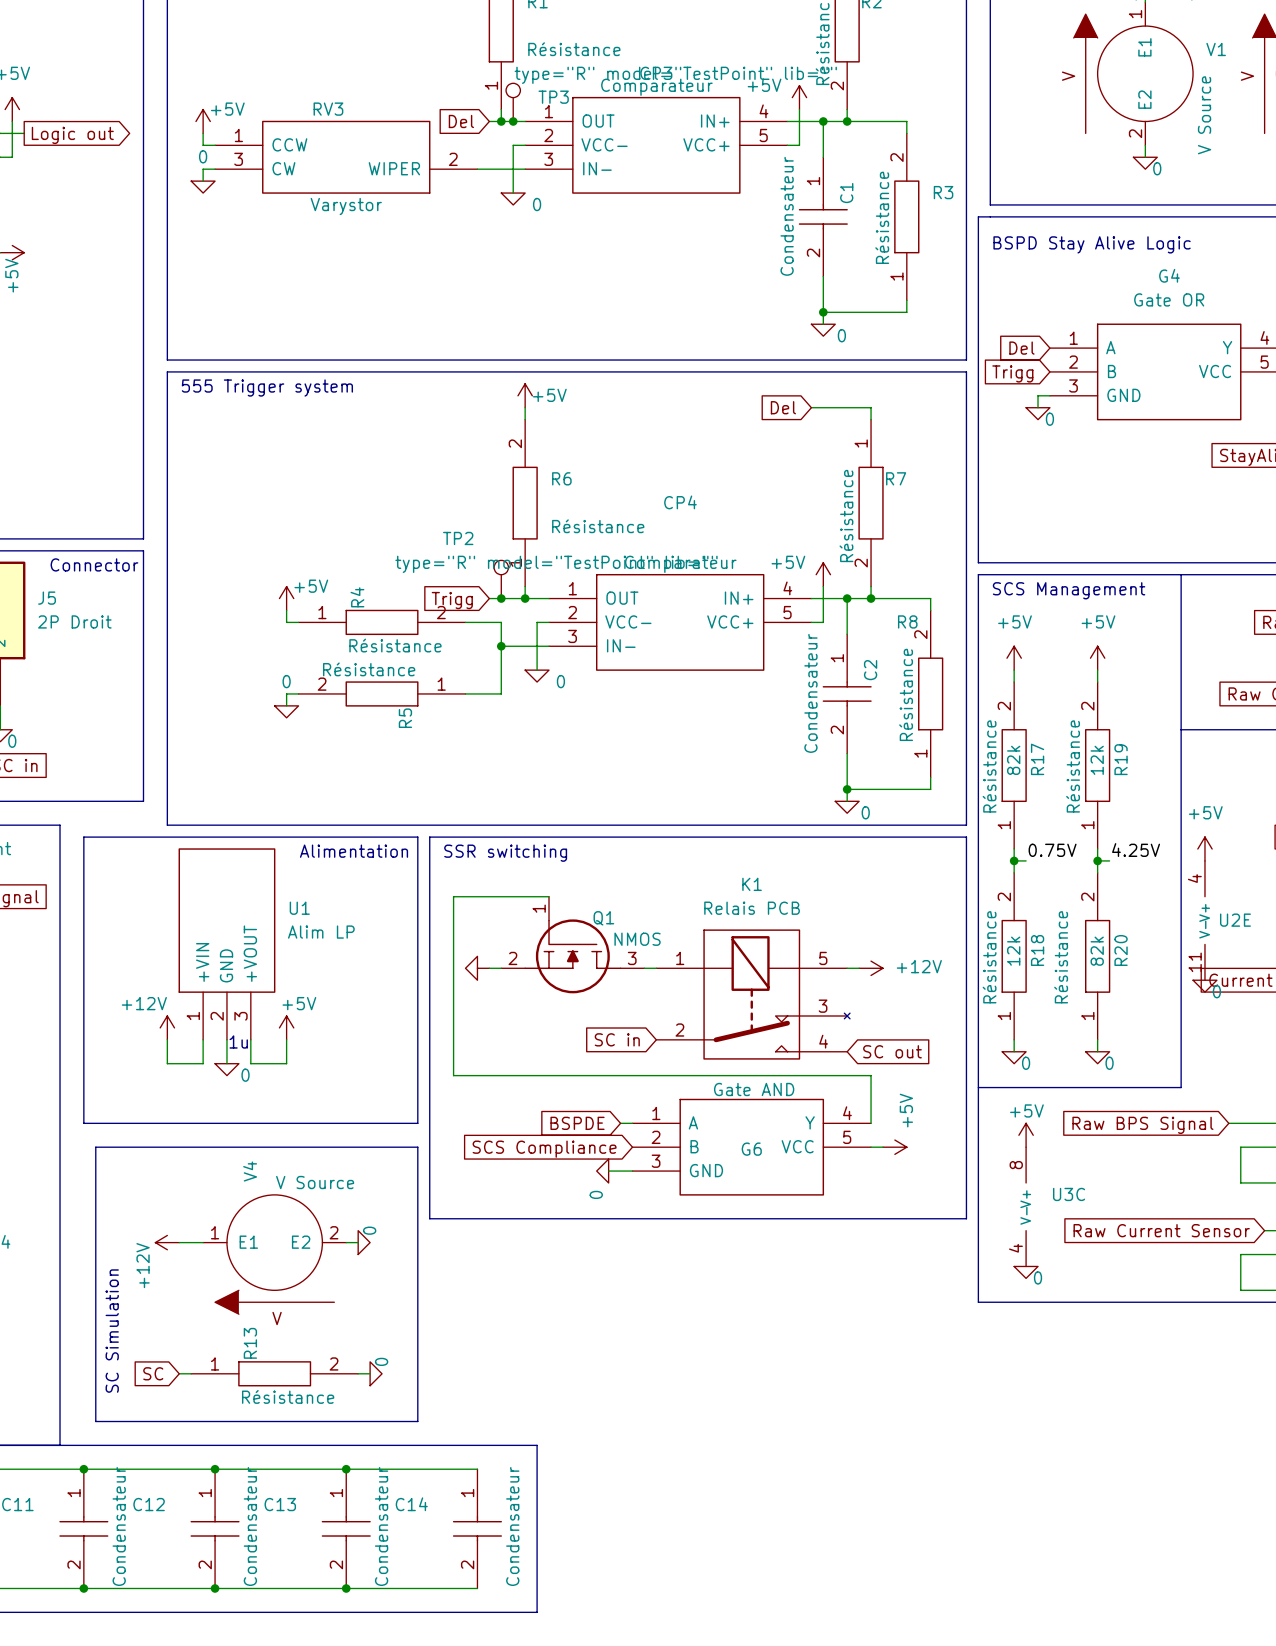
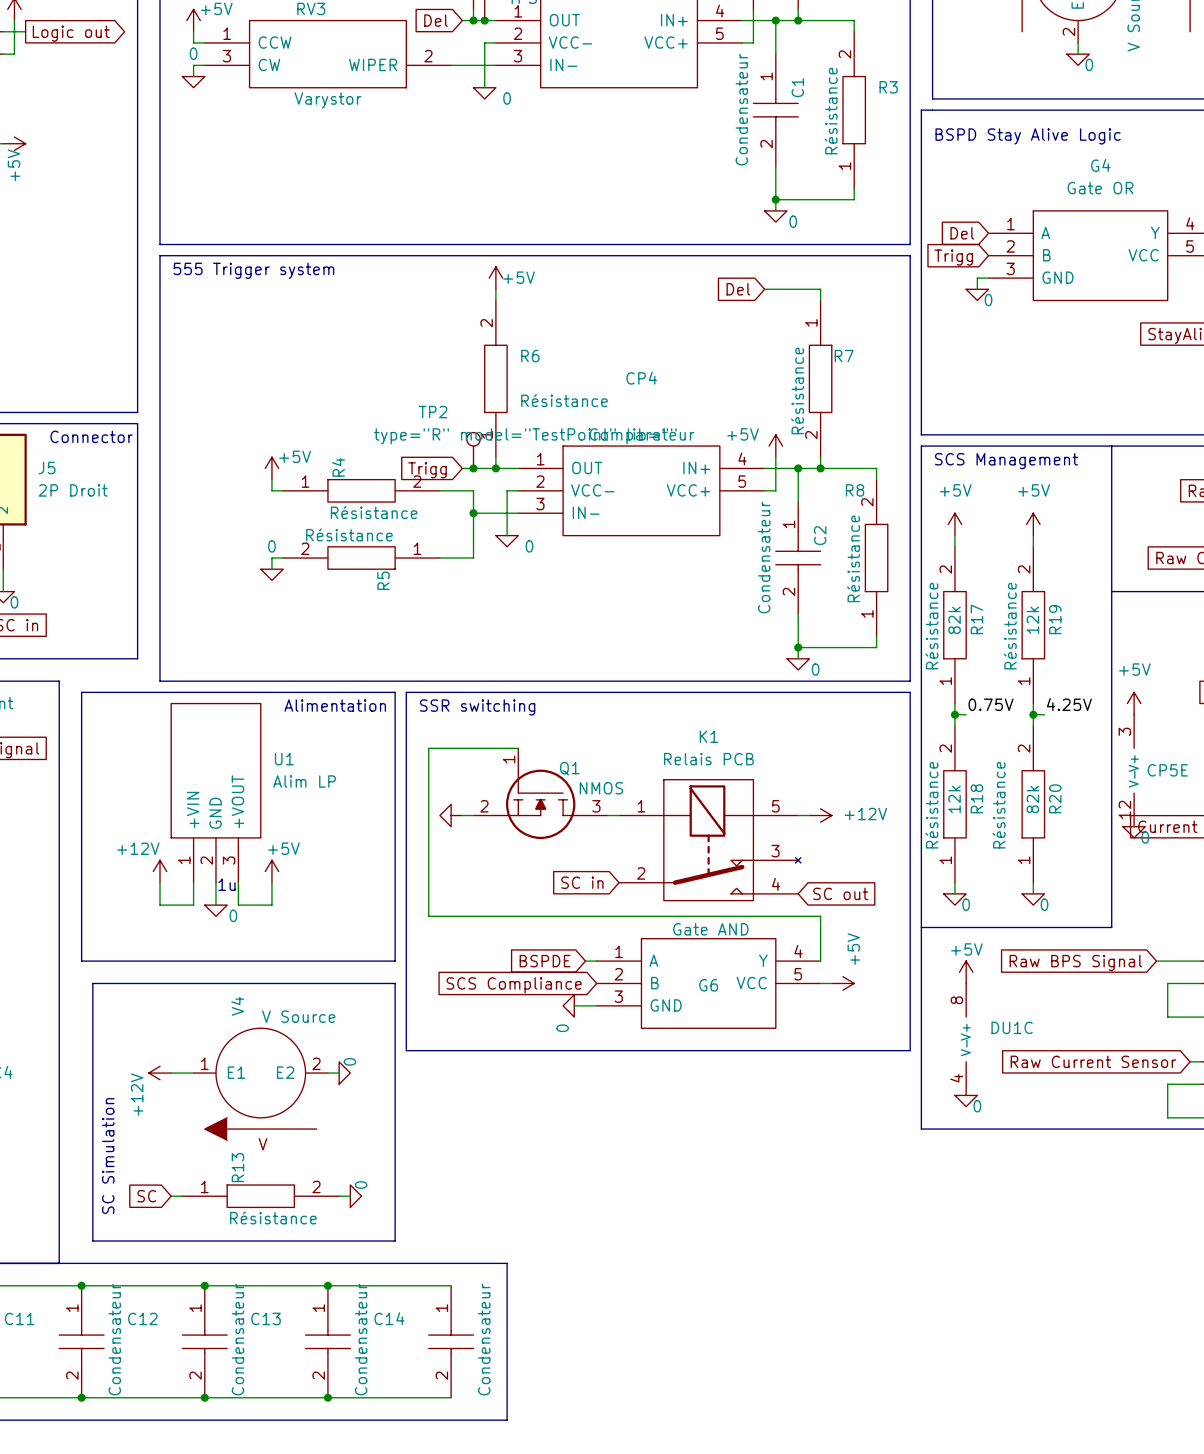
U2E pin number: 4 (1194, 878) -> 3 (1124, 731)
U2E name: U2E (1235, 920) -> CP5E (1167, 770)
U2E pin number: 11 (1195, 962) -> 12 (1124, 809)
U3C name: U3C (1069, 1194) -> DU1C (1012, 1027)

